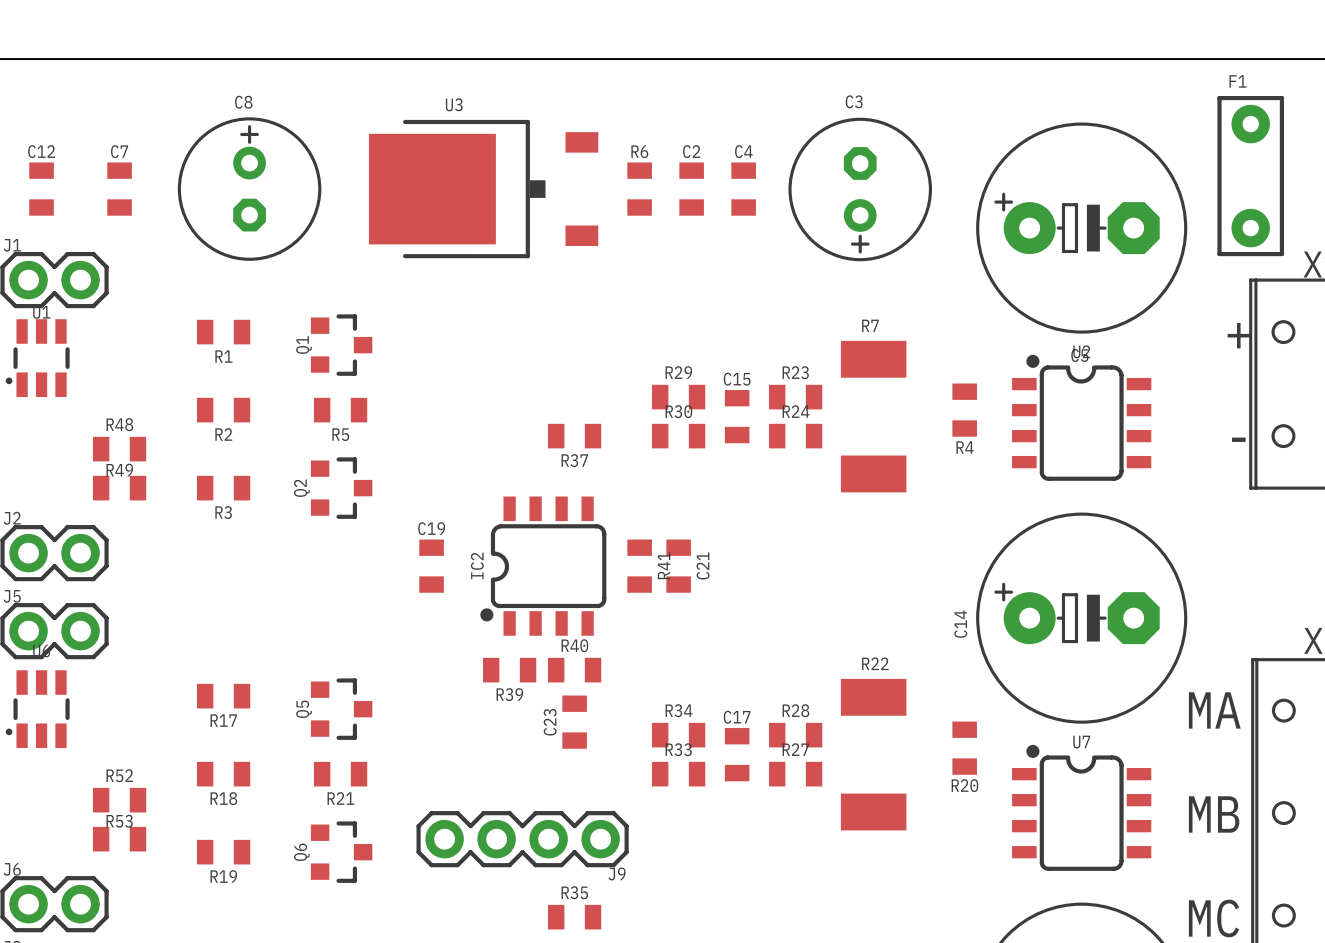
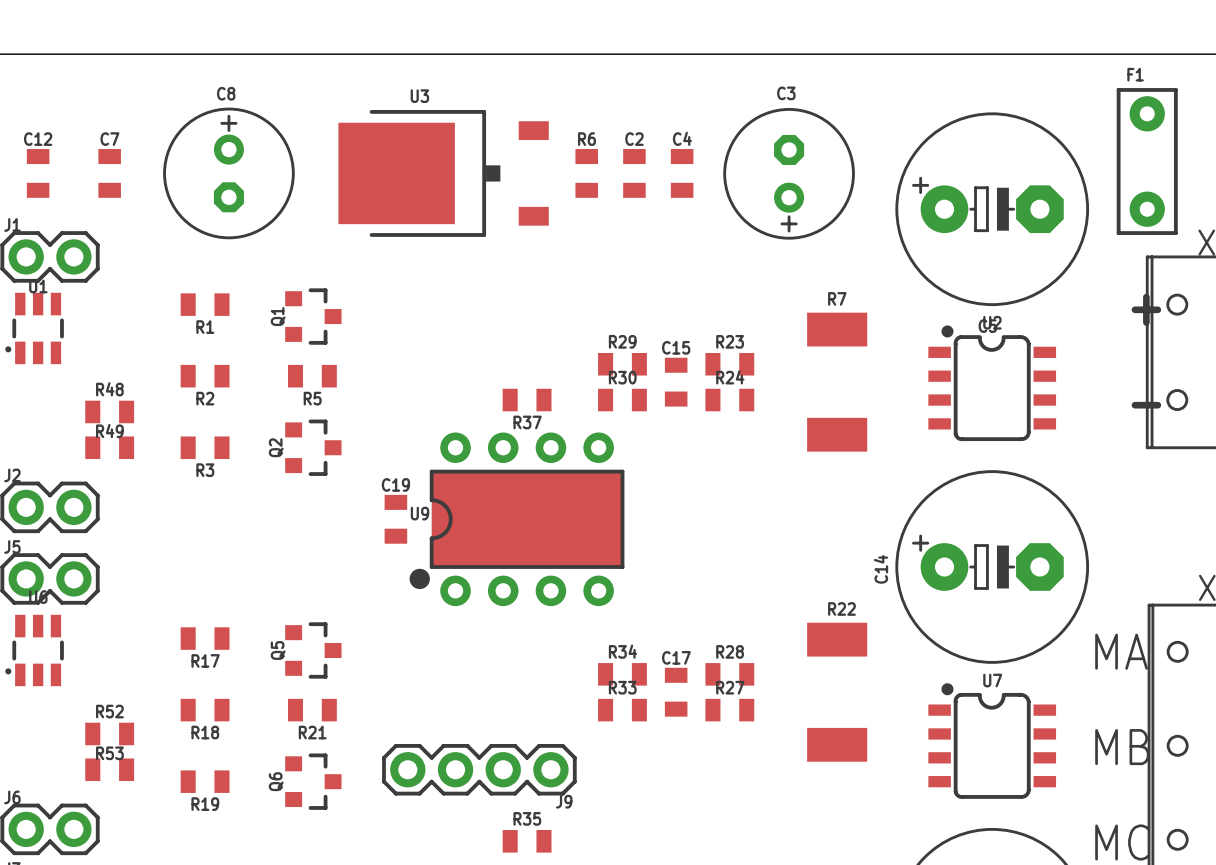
R4: (964, 410) -> none
R7 position: (873, 416) -> (837, 382)
drawing: none -> [431, 471, 623, 568]
IC2: (543, 566) -> none
U9: none -> (517, 519)
R41: (639, 566) -> none
C21: (678, 566) -> none
R39: (509, 670) -> none
R40: (574, 670) -> none
C23: (574, 722) -> none
R20: (964, 748) -> none
R22 position: (873, 754) -> (837, 692)

